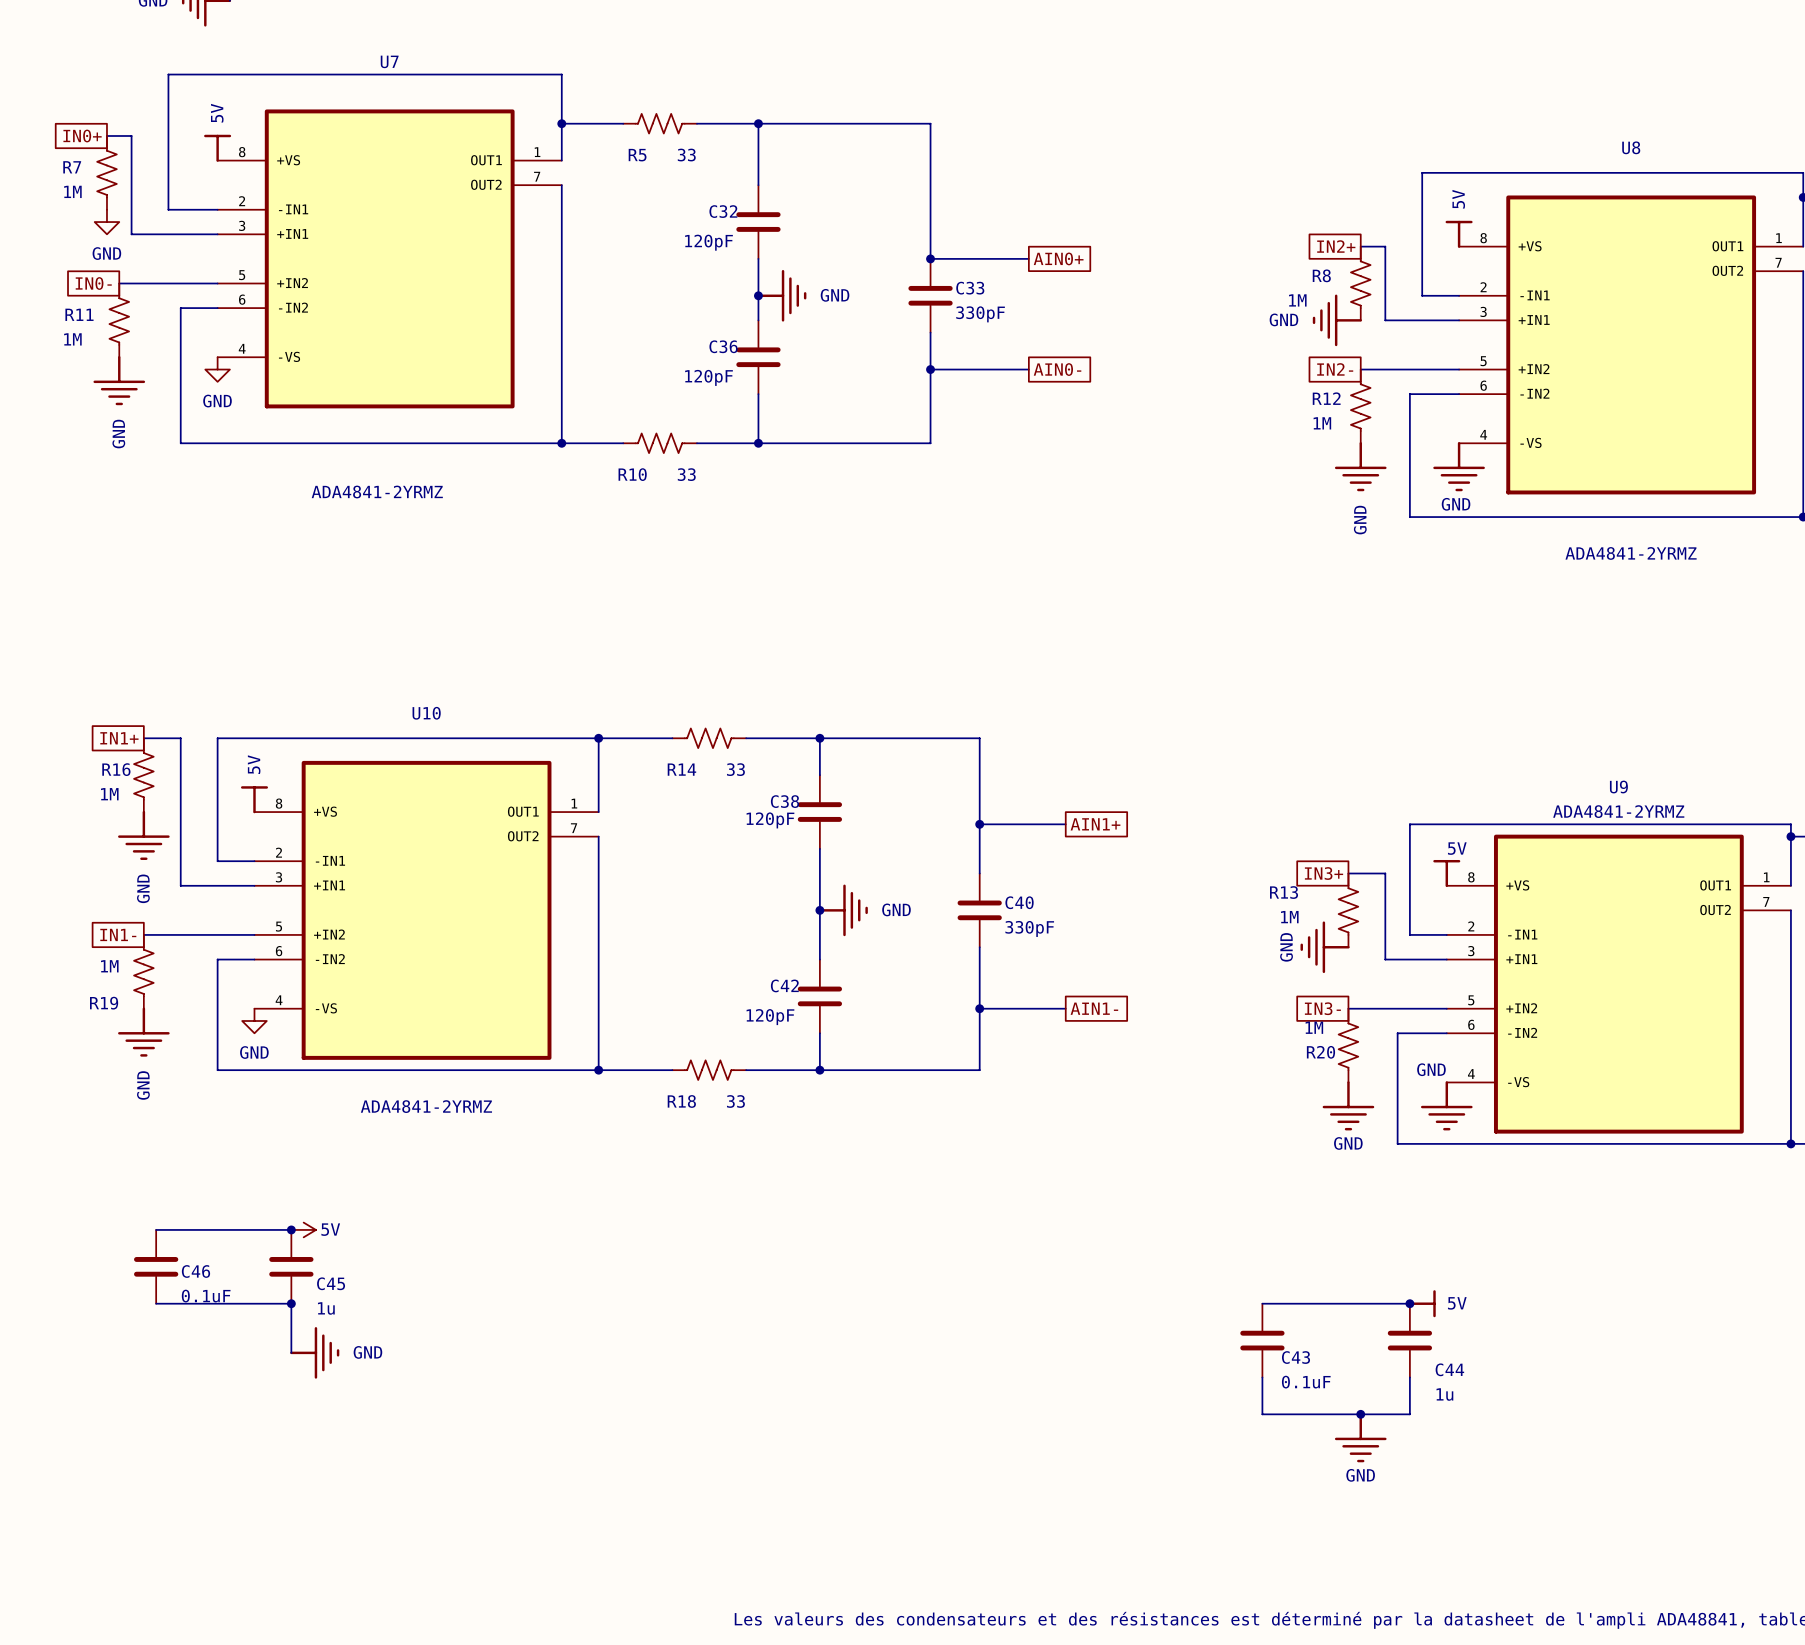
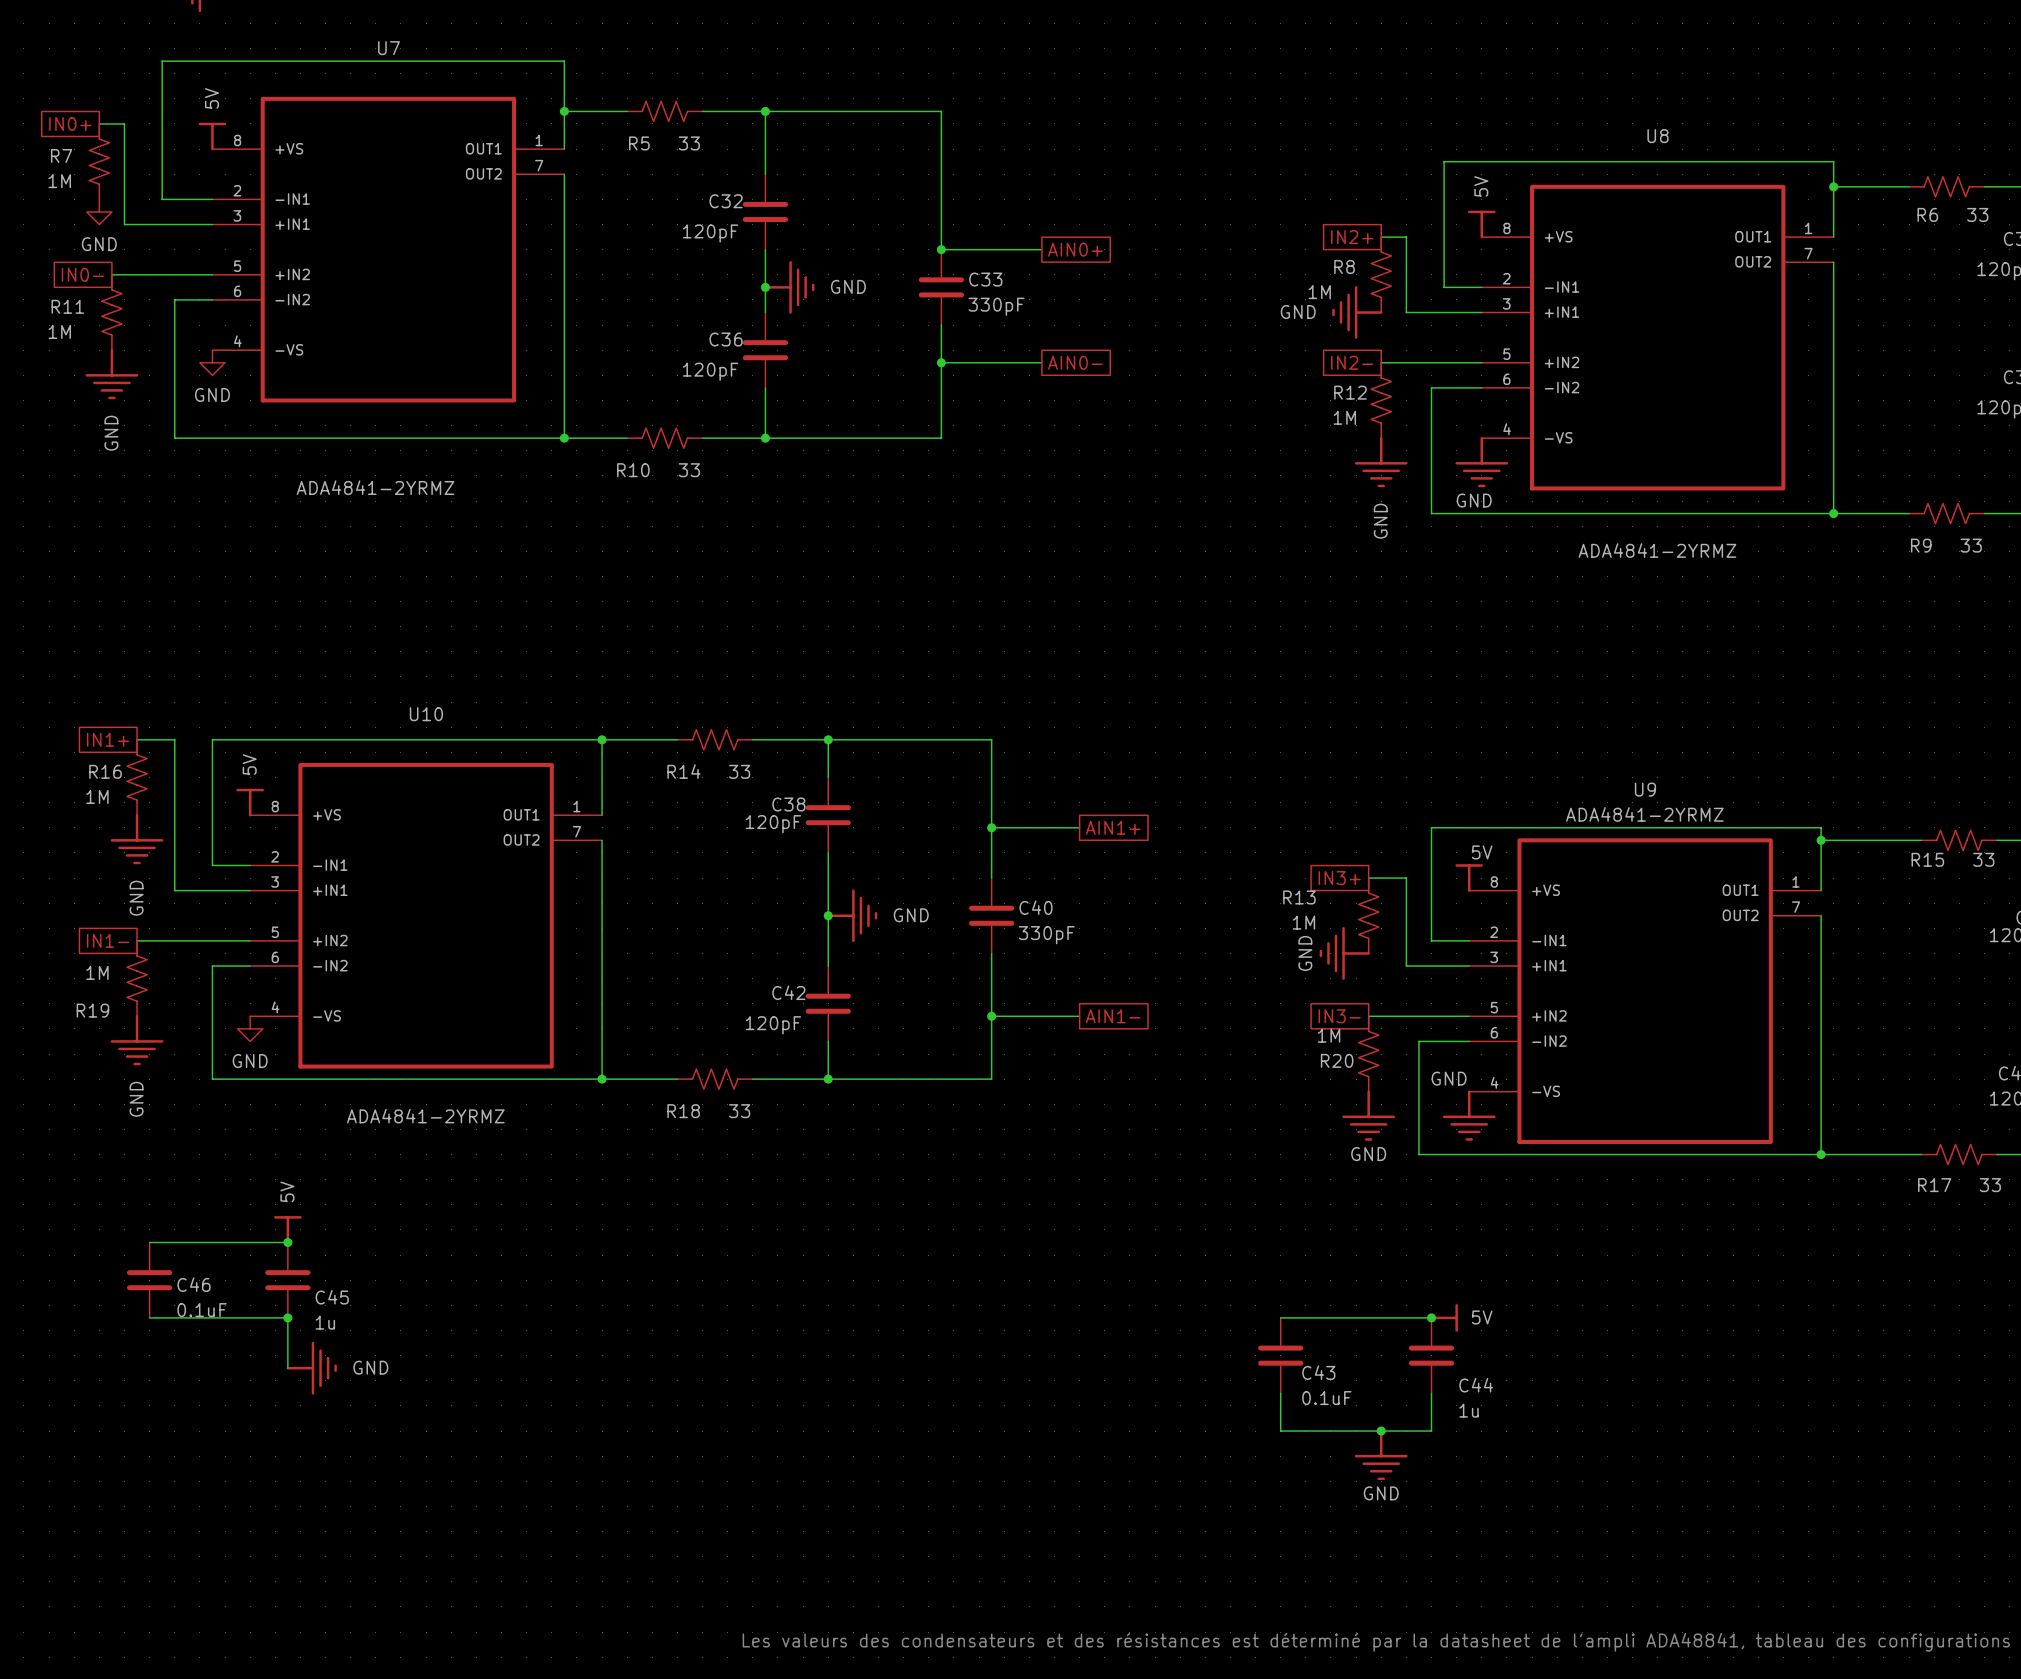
power symbol: none -> 5V (287, 1229)
power symbol: 5V (303, 1229) -> none

